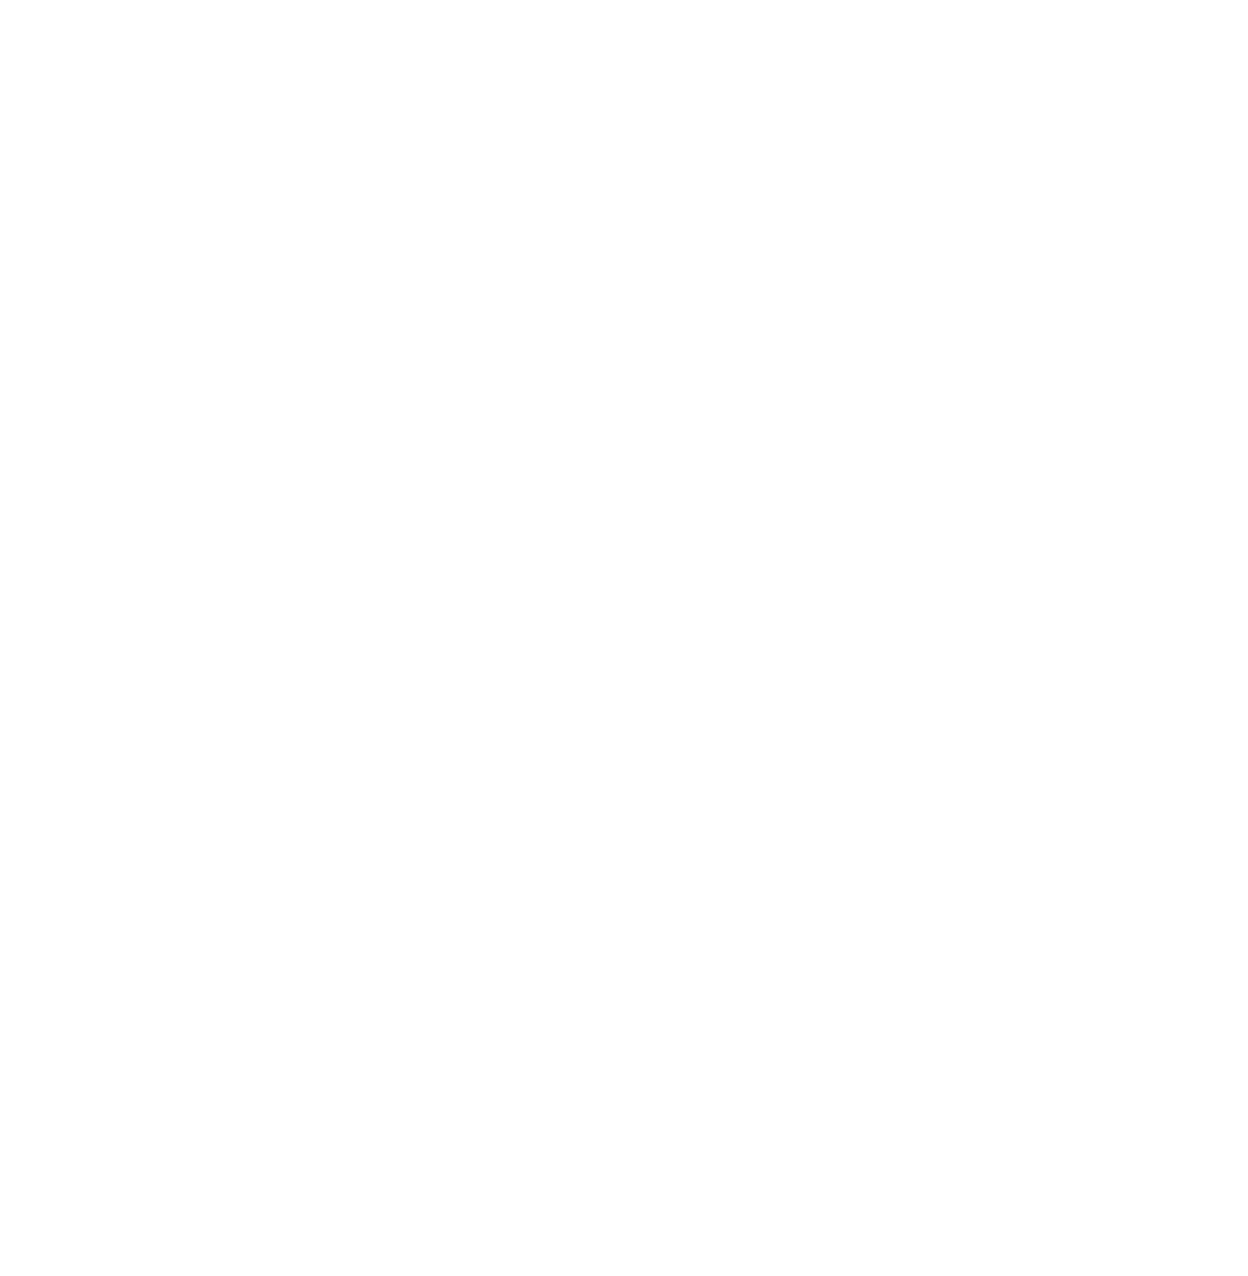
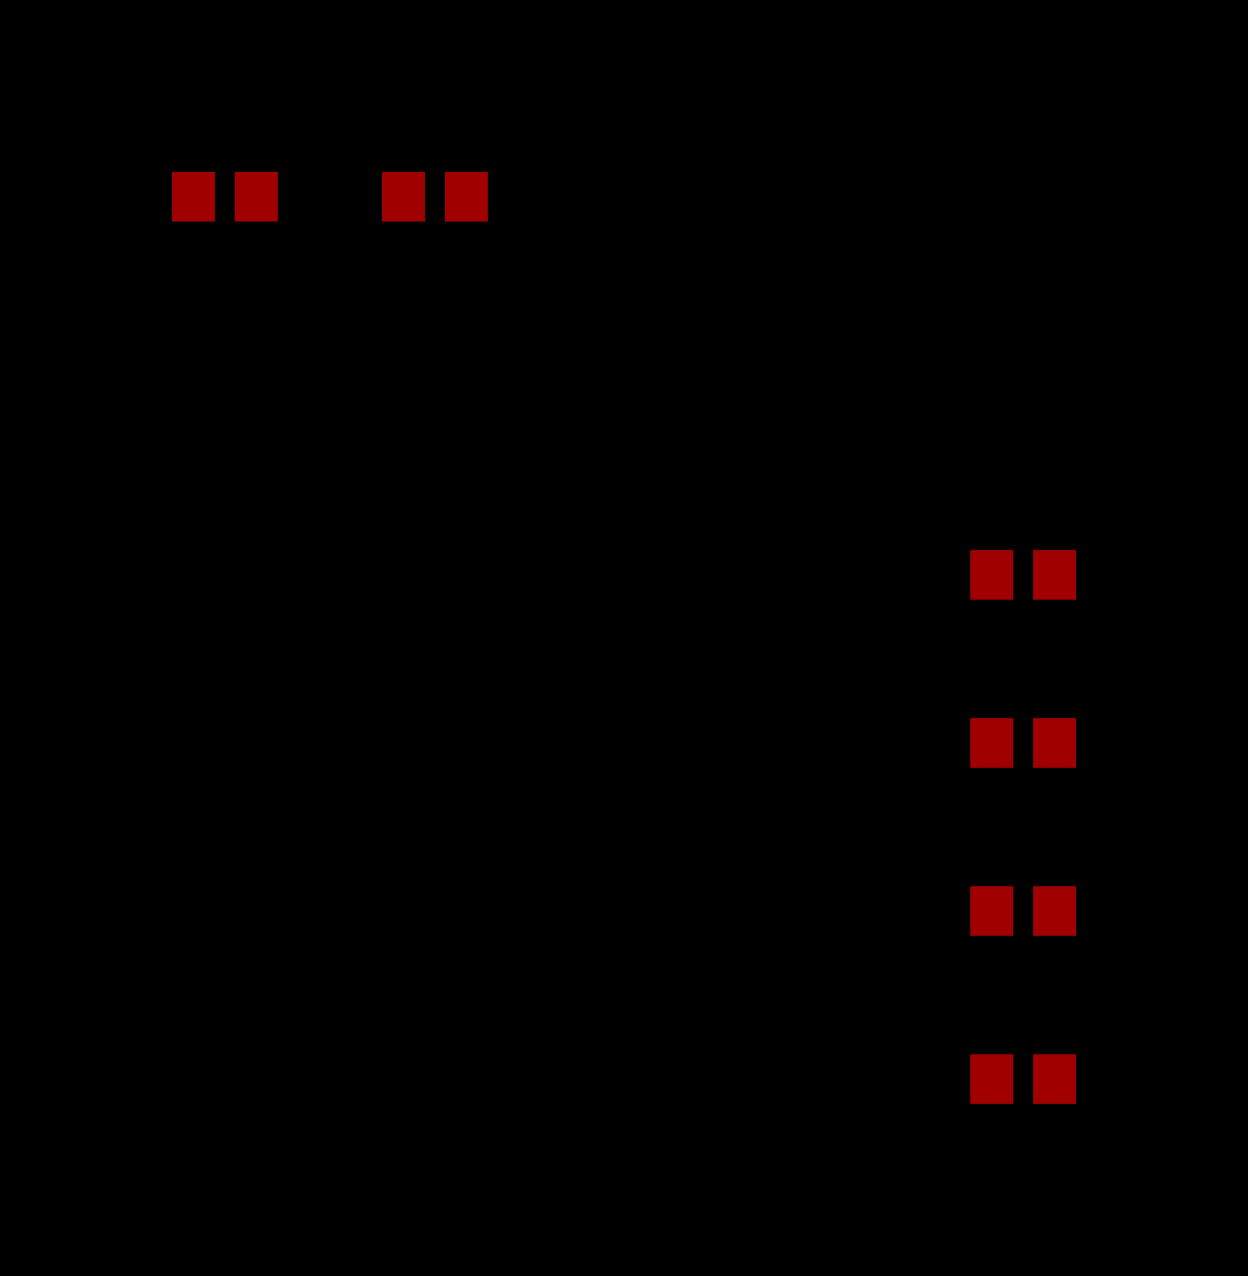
part: none -> (224, 196)
part: none -> (434, 196)
part: none -> (1023, 574)
part: none -> (1023, 742)
part: none -> (1023, 911)
part: none -> (1023, 1079)

